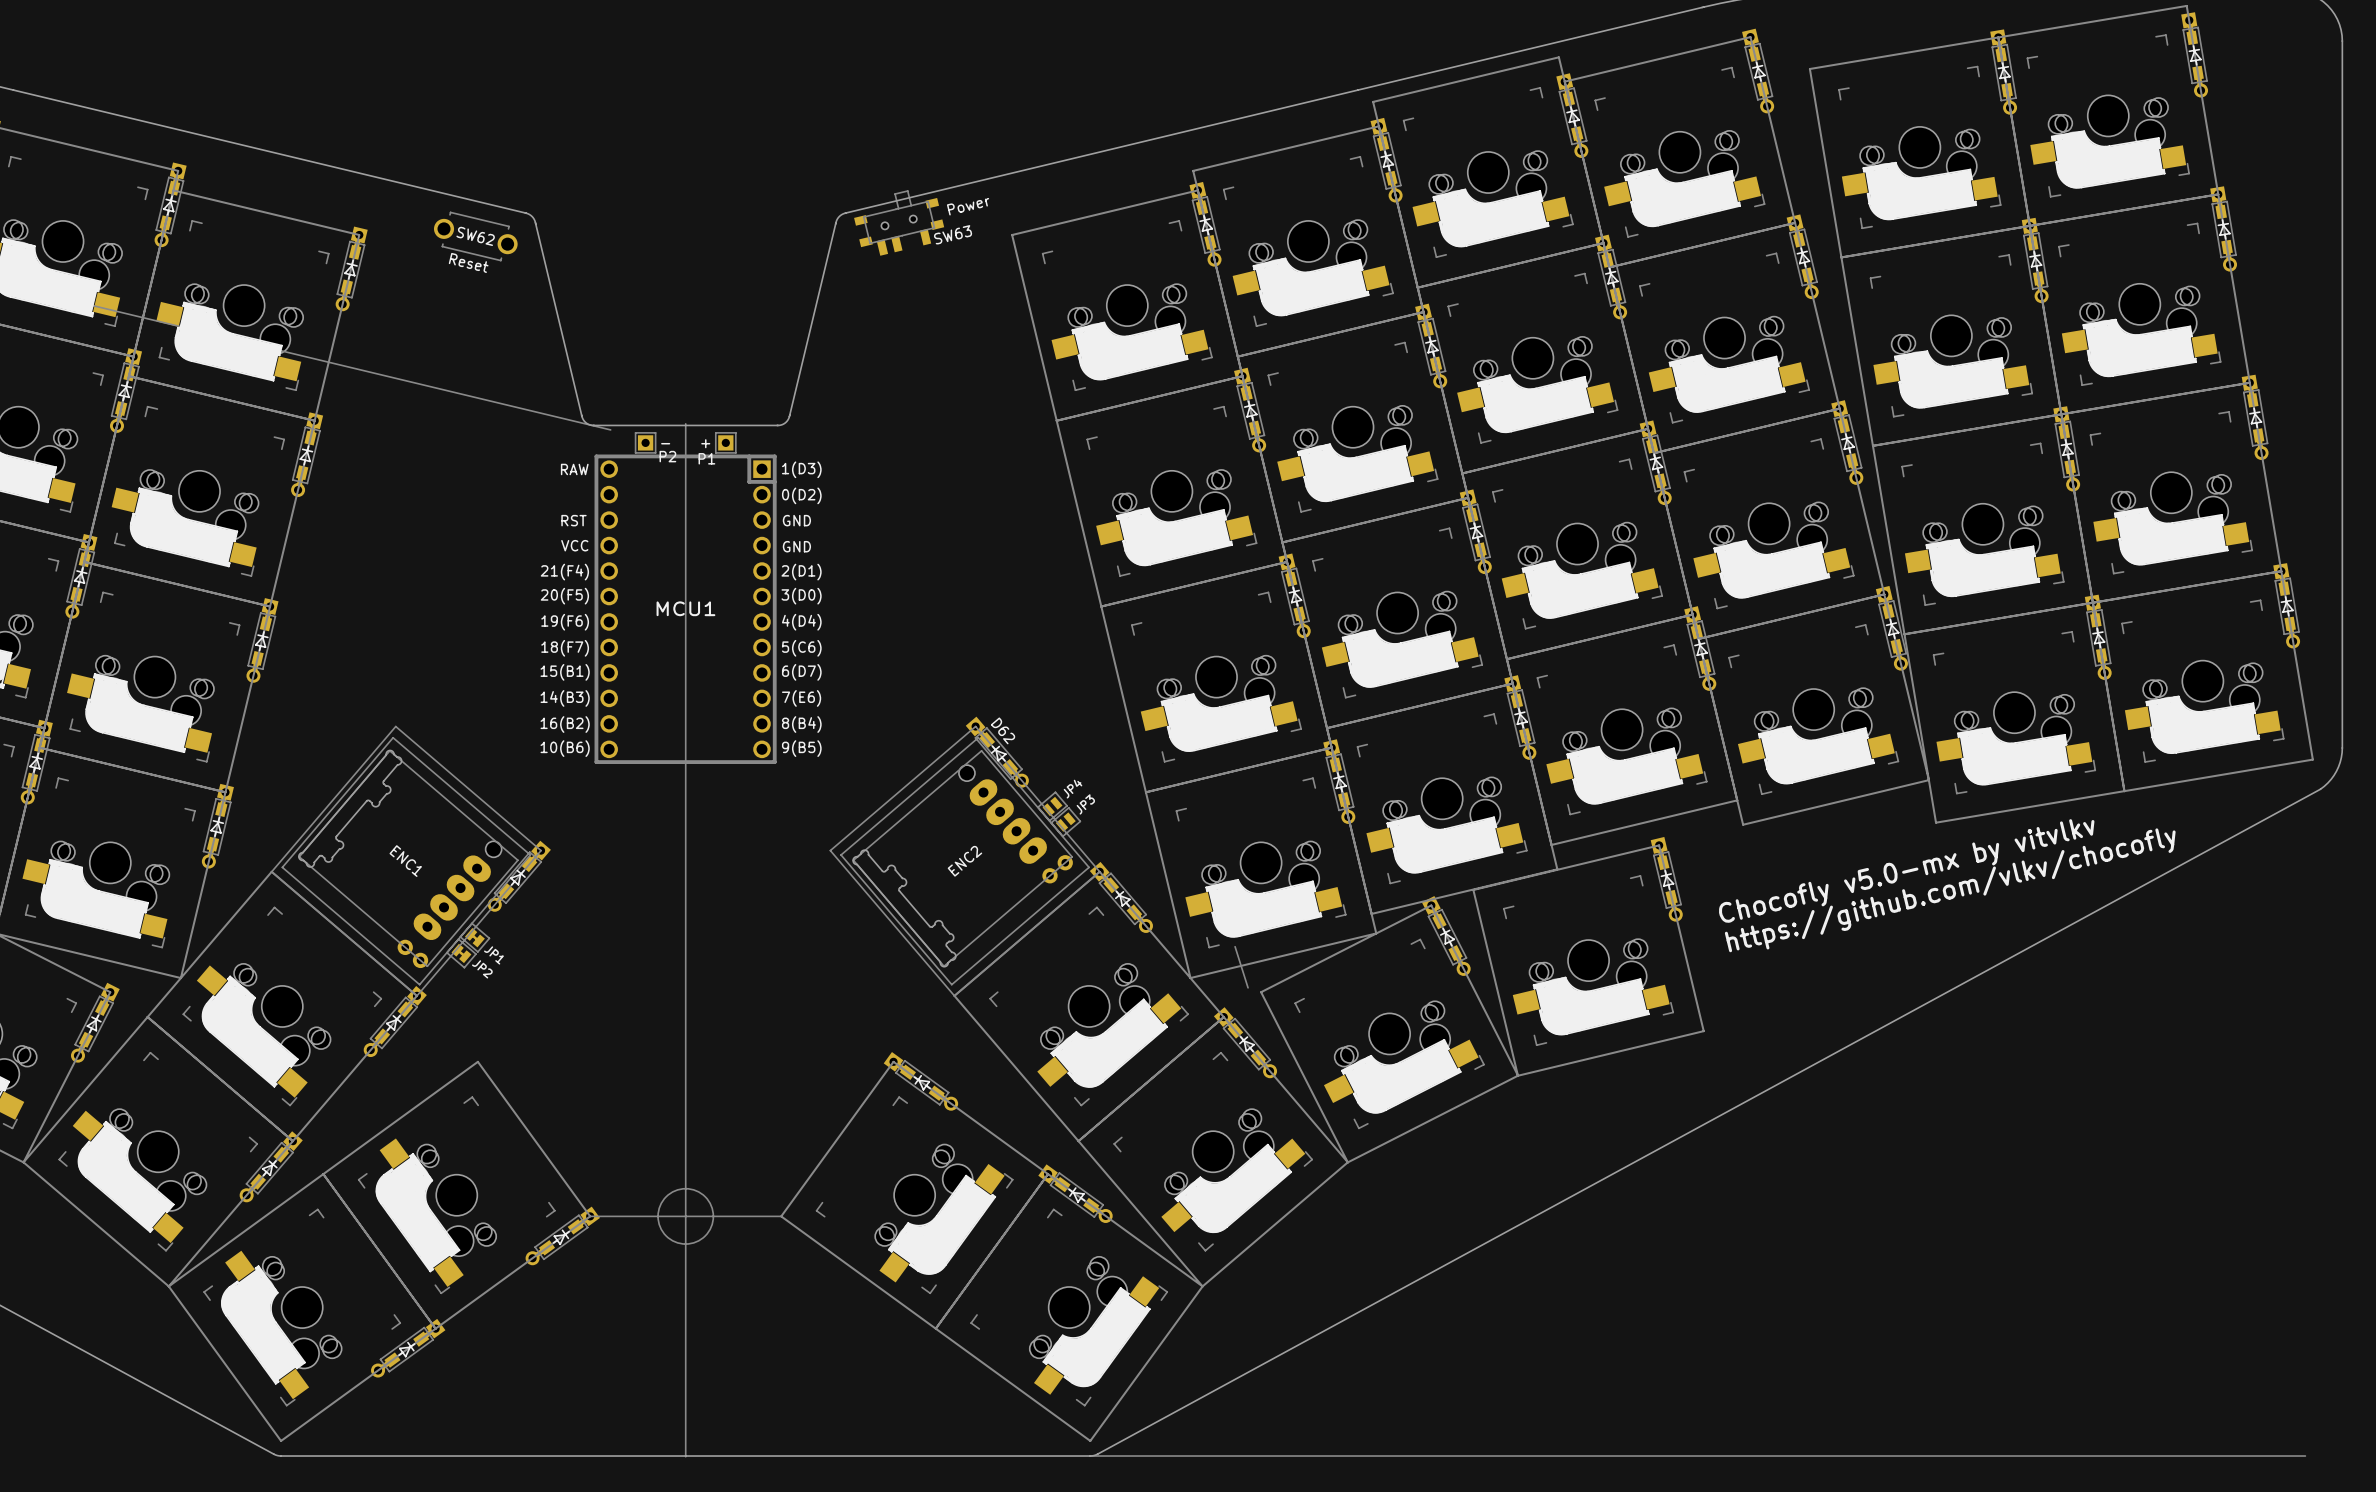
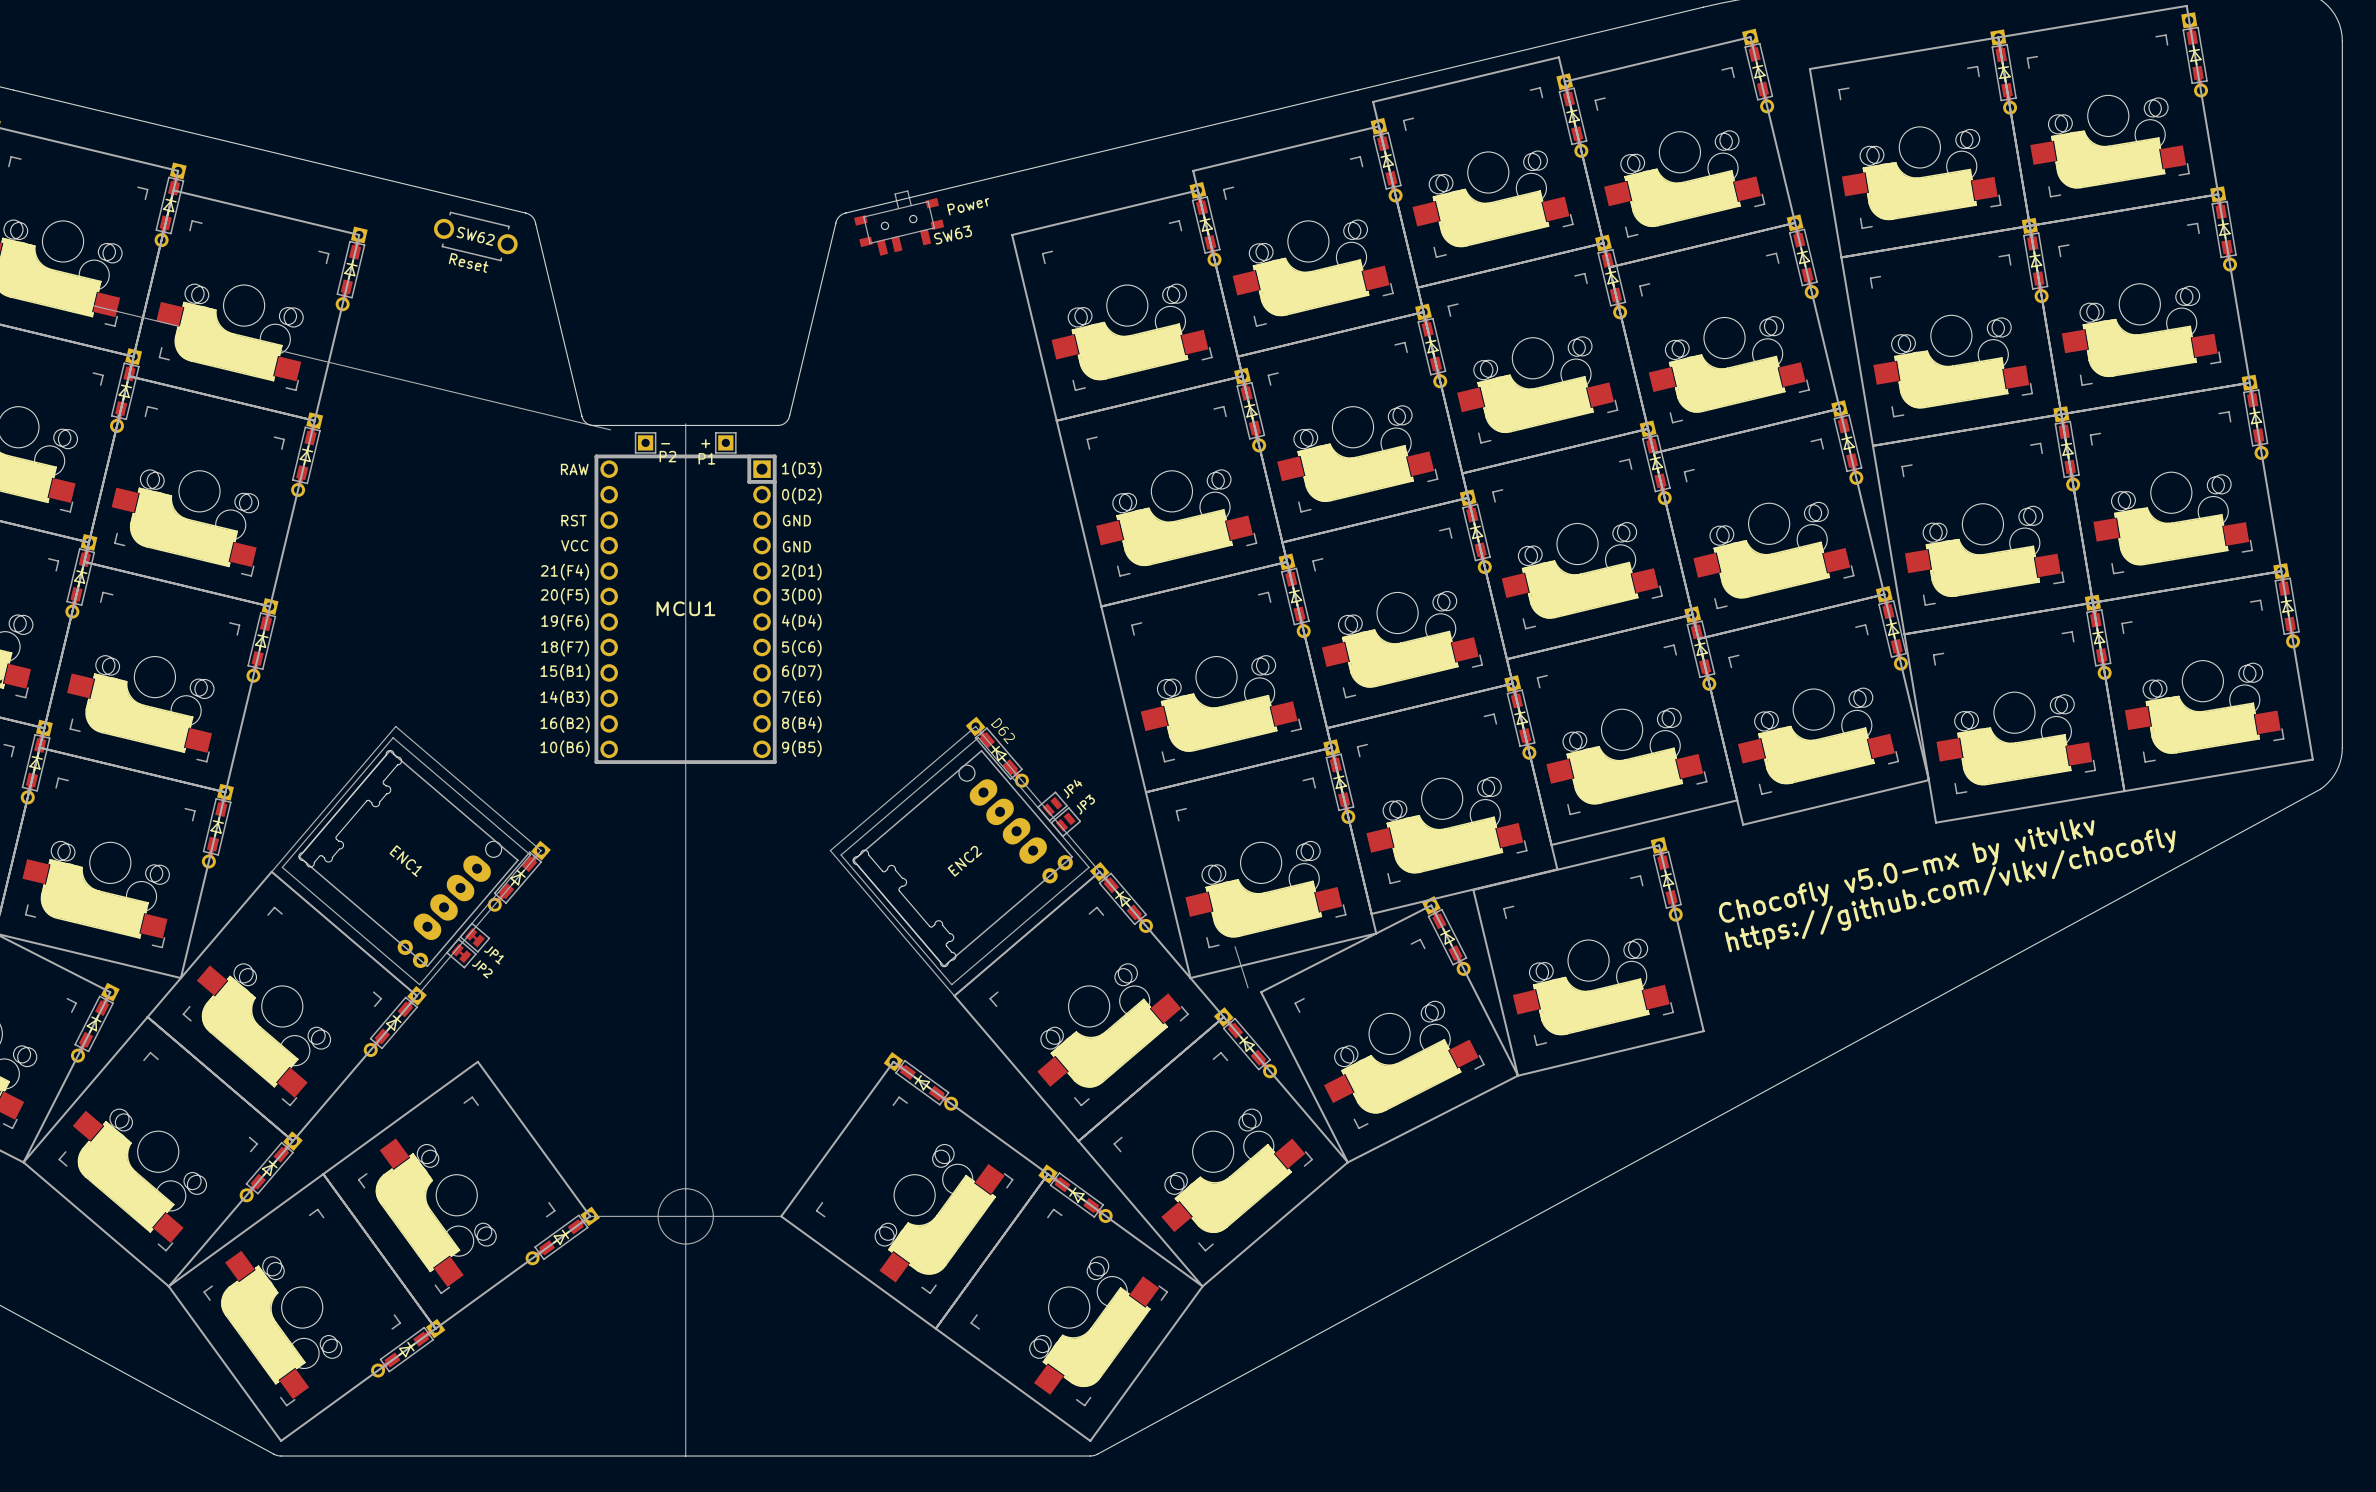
line: (1090, 1456) (2305, 1456) -> none

